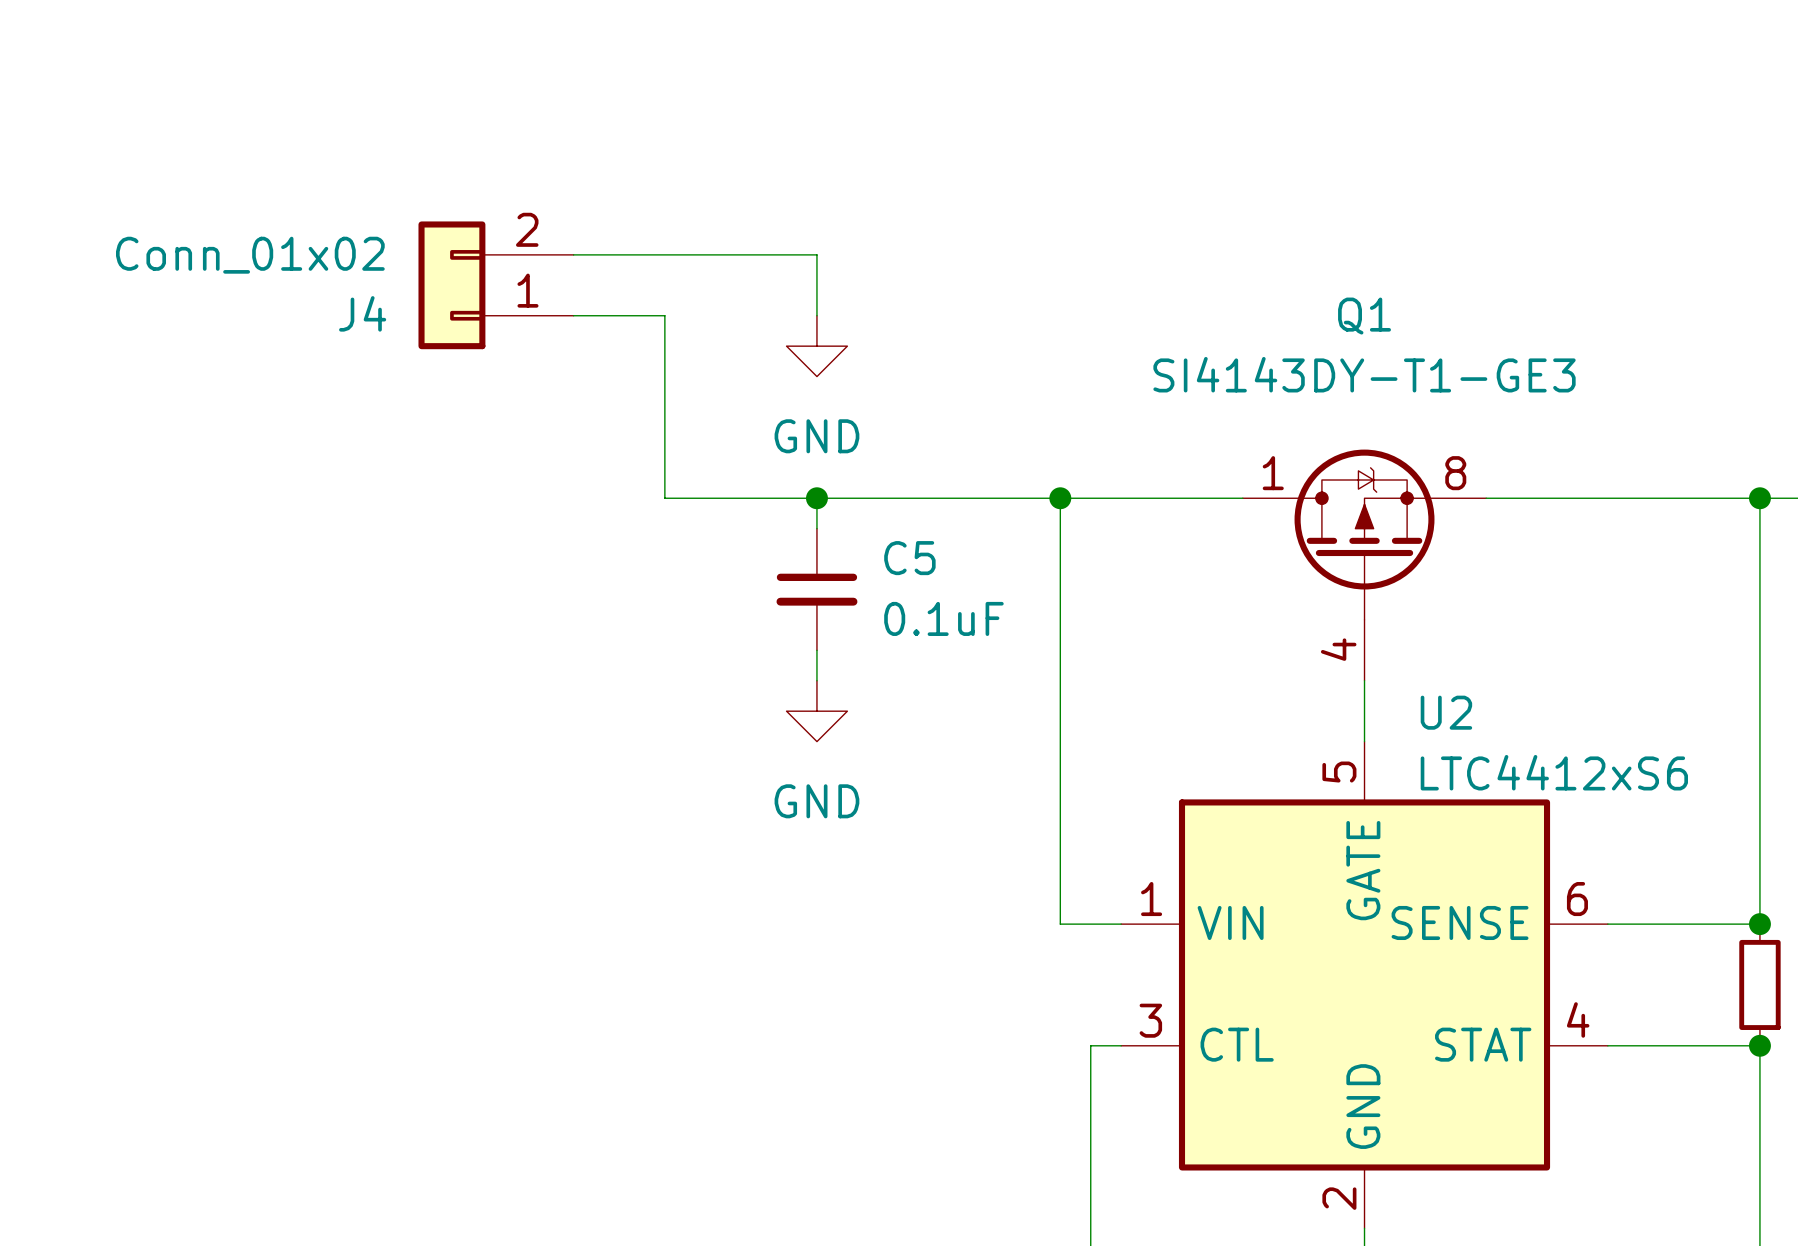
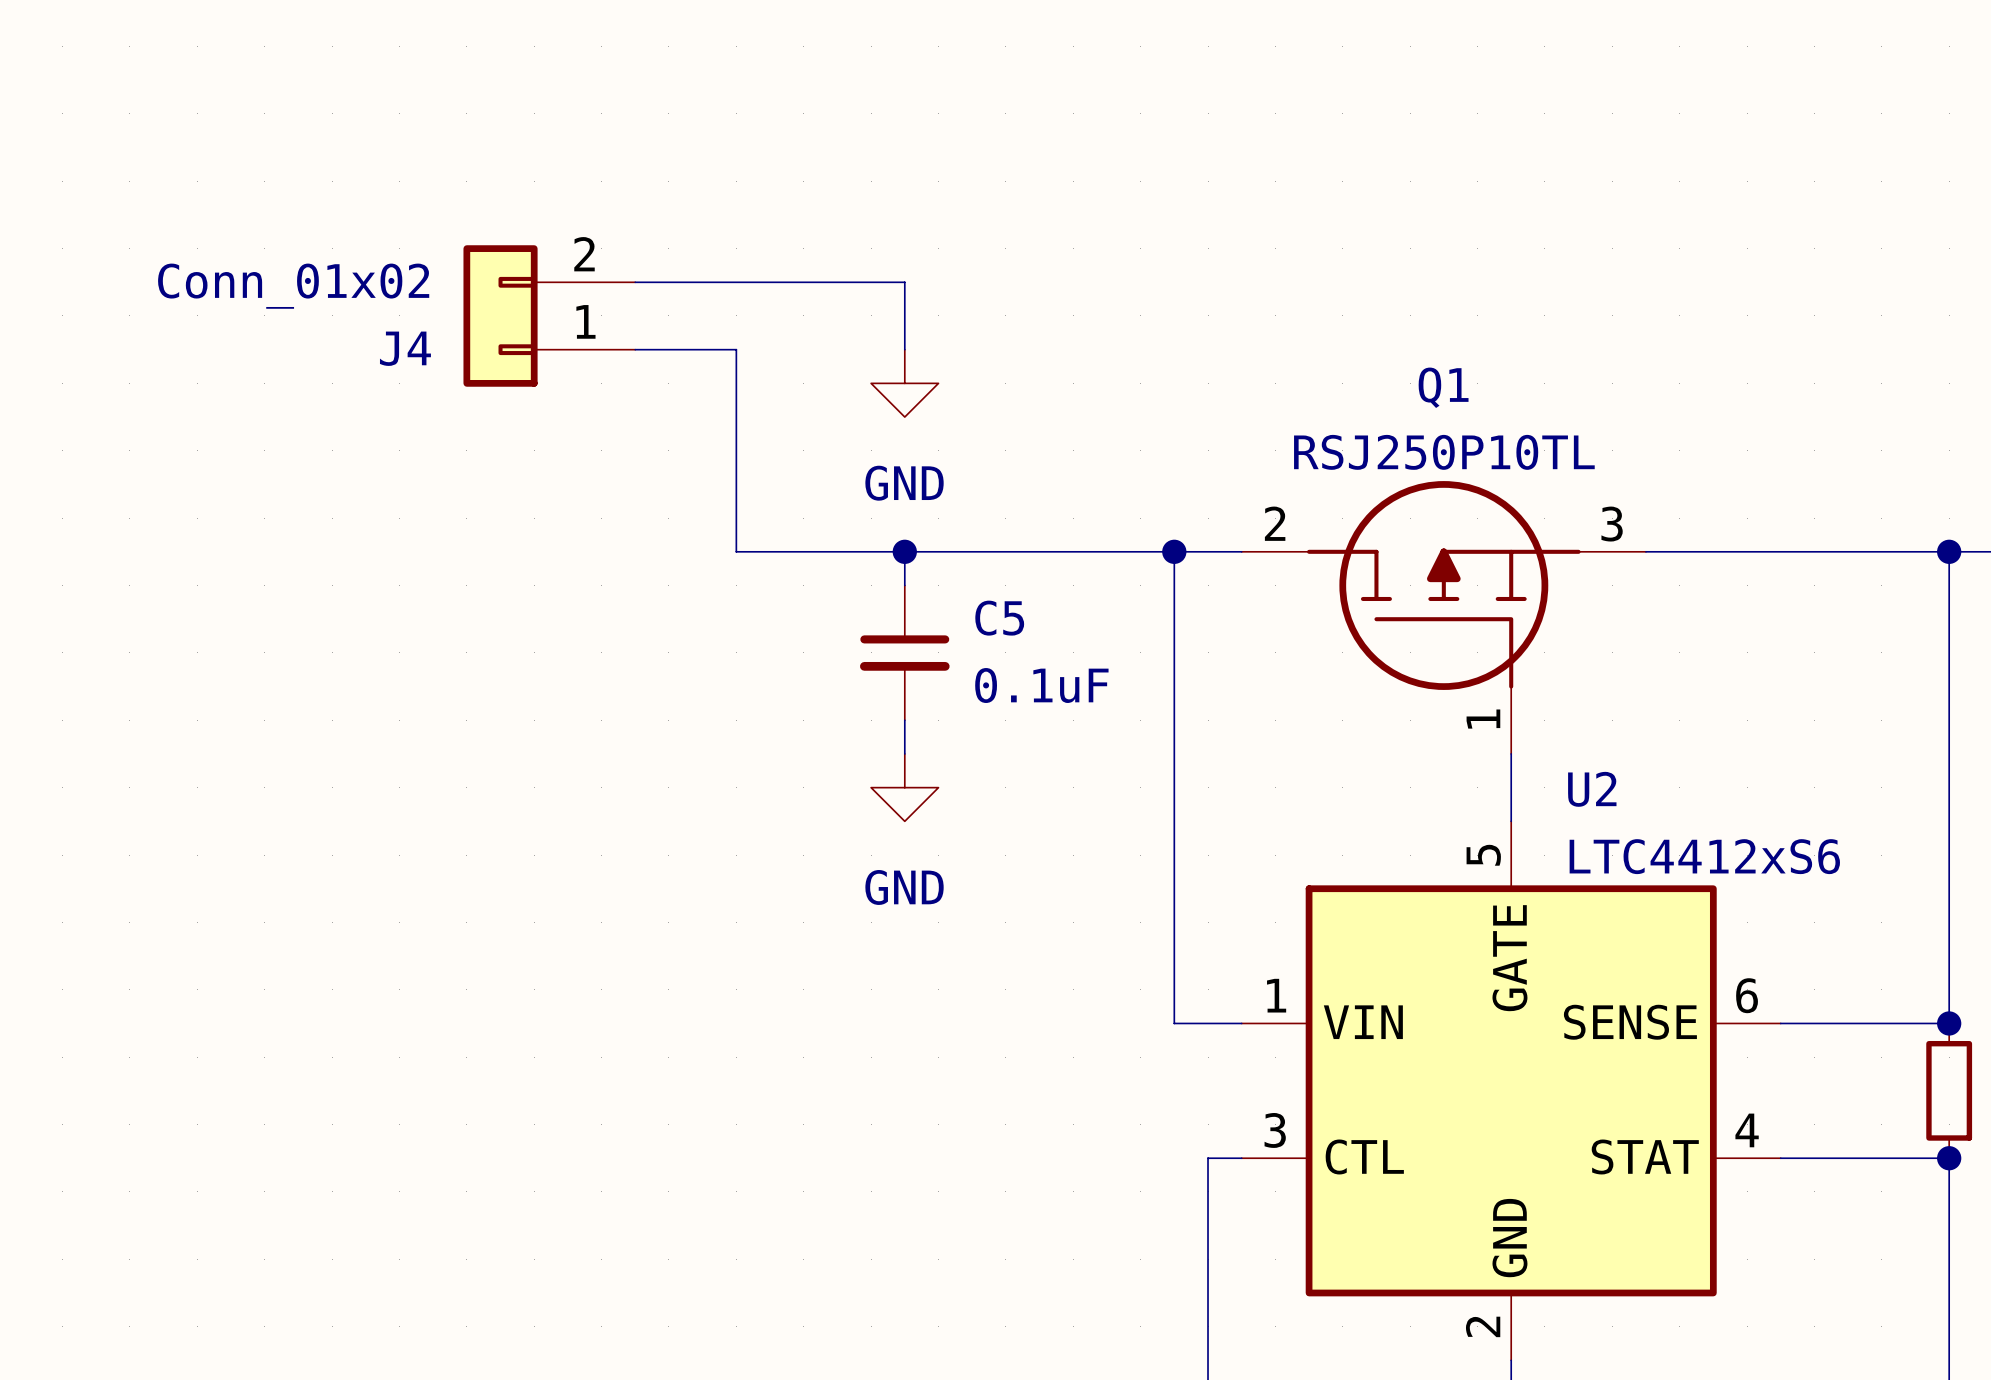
Q1 value: SI4143DY-T1-GE3 (1364, 374) -> RSJ250P10TL (1444, 452)
Q1 symbol: [1242, 449, 1487, 681] -> [1241, 481, 1646, 754]

